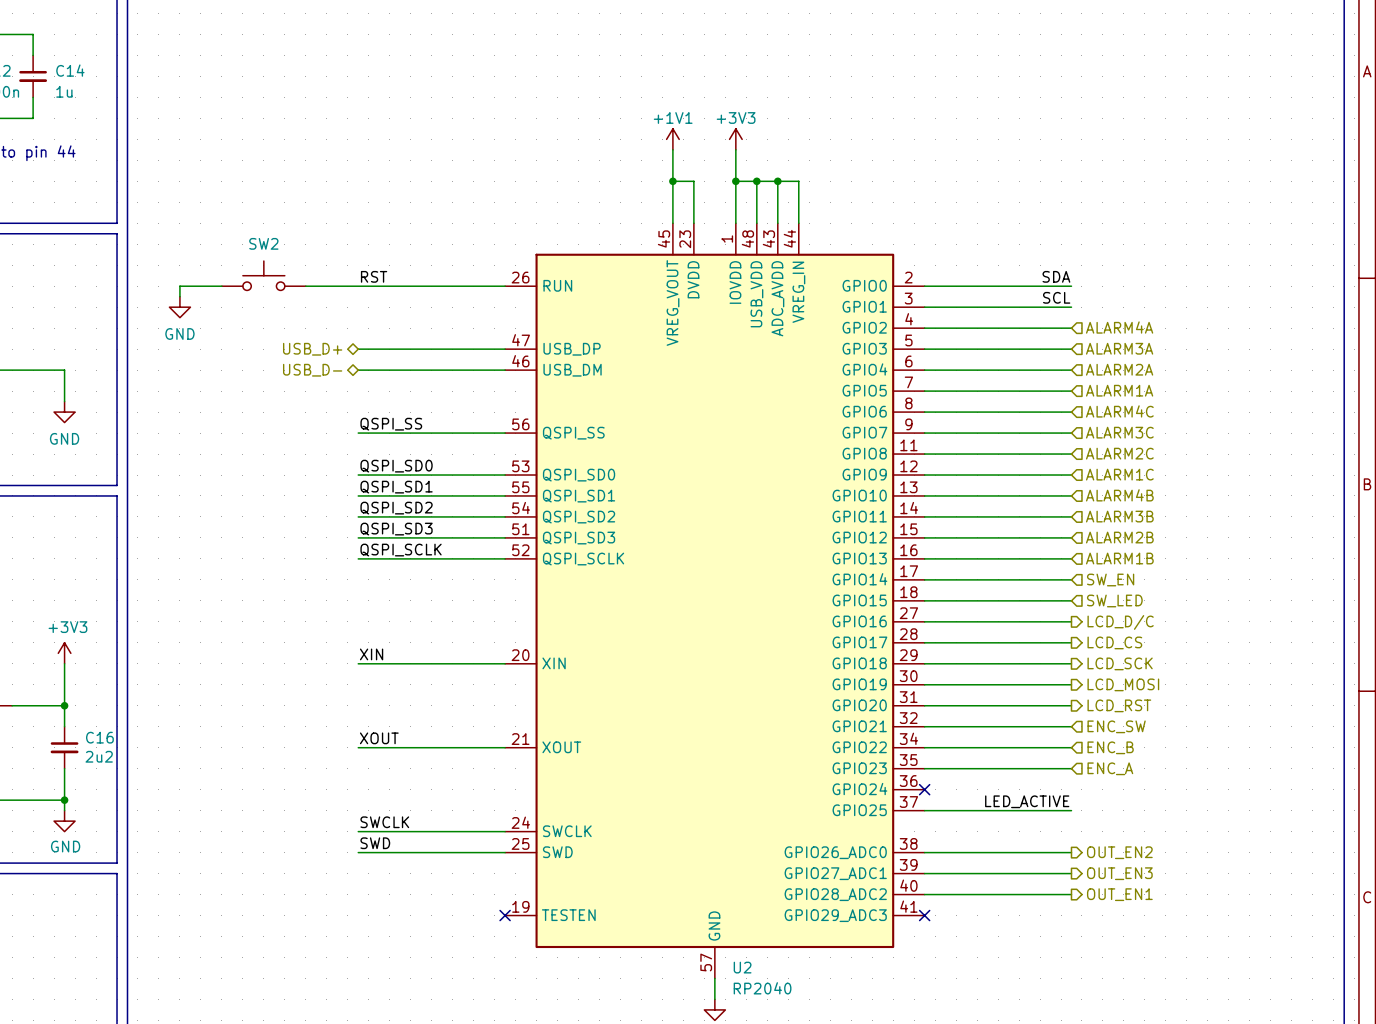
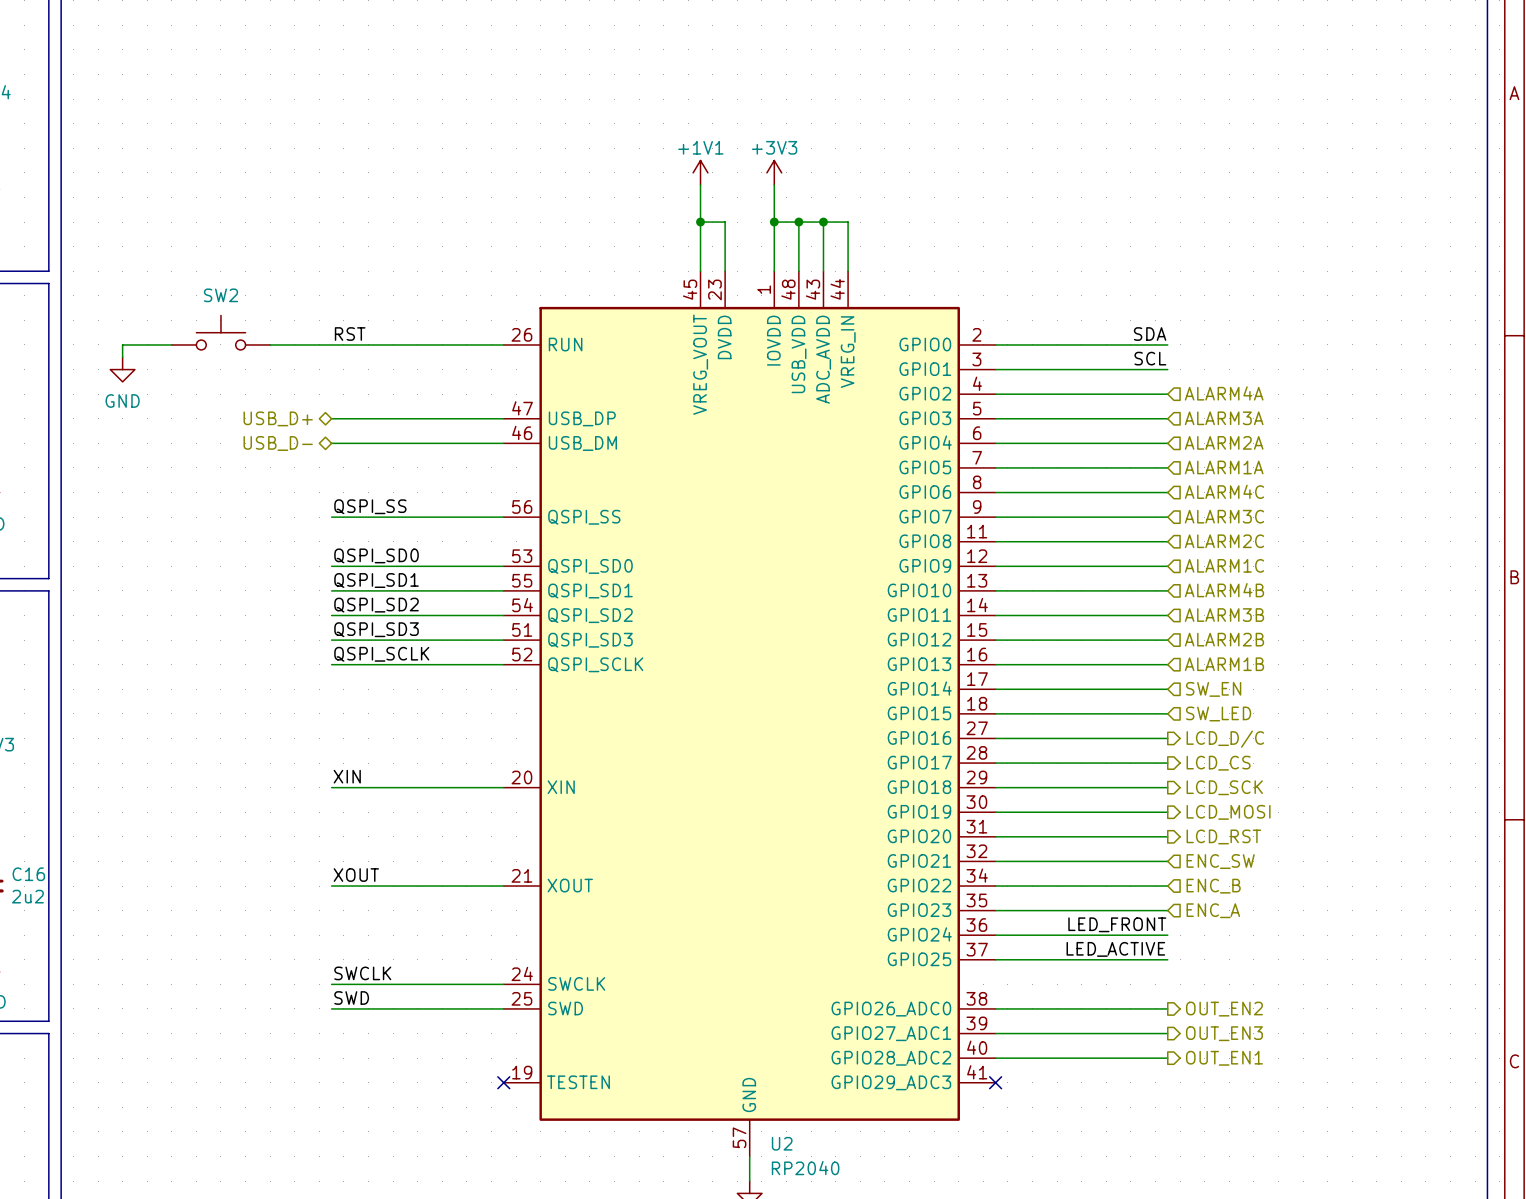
label: none -> LED_FRONT (1117, 924)
wire: none -> (995, 935) (1167, 935)
no-connect mark: (924, 789) -> none

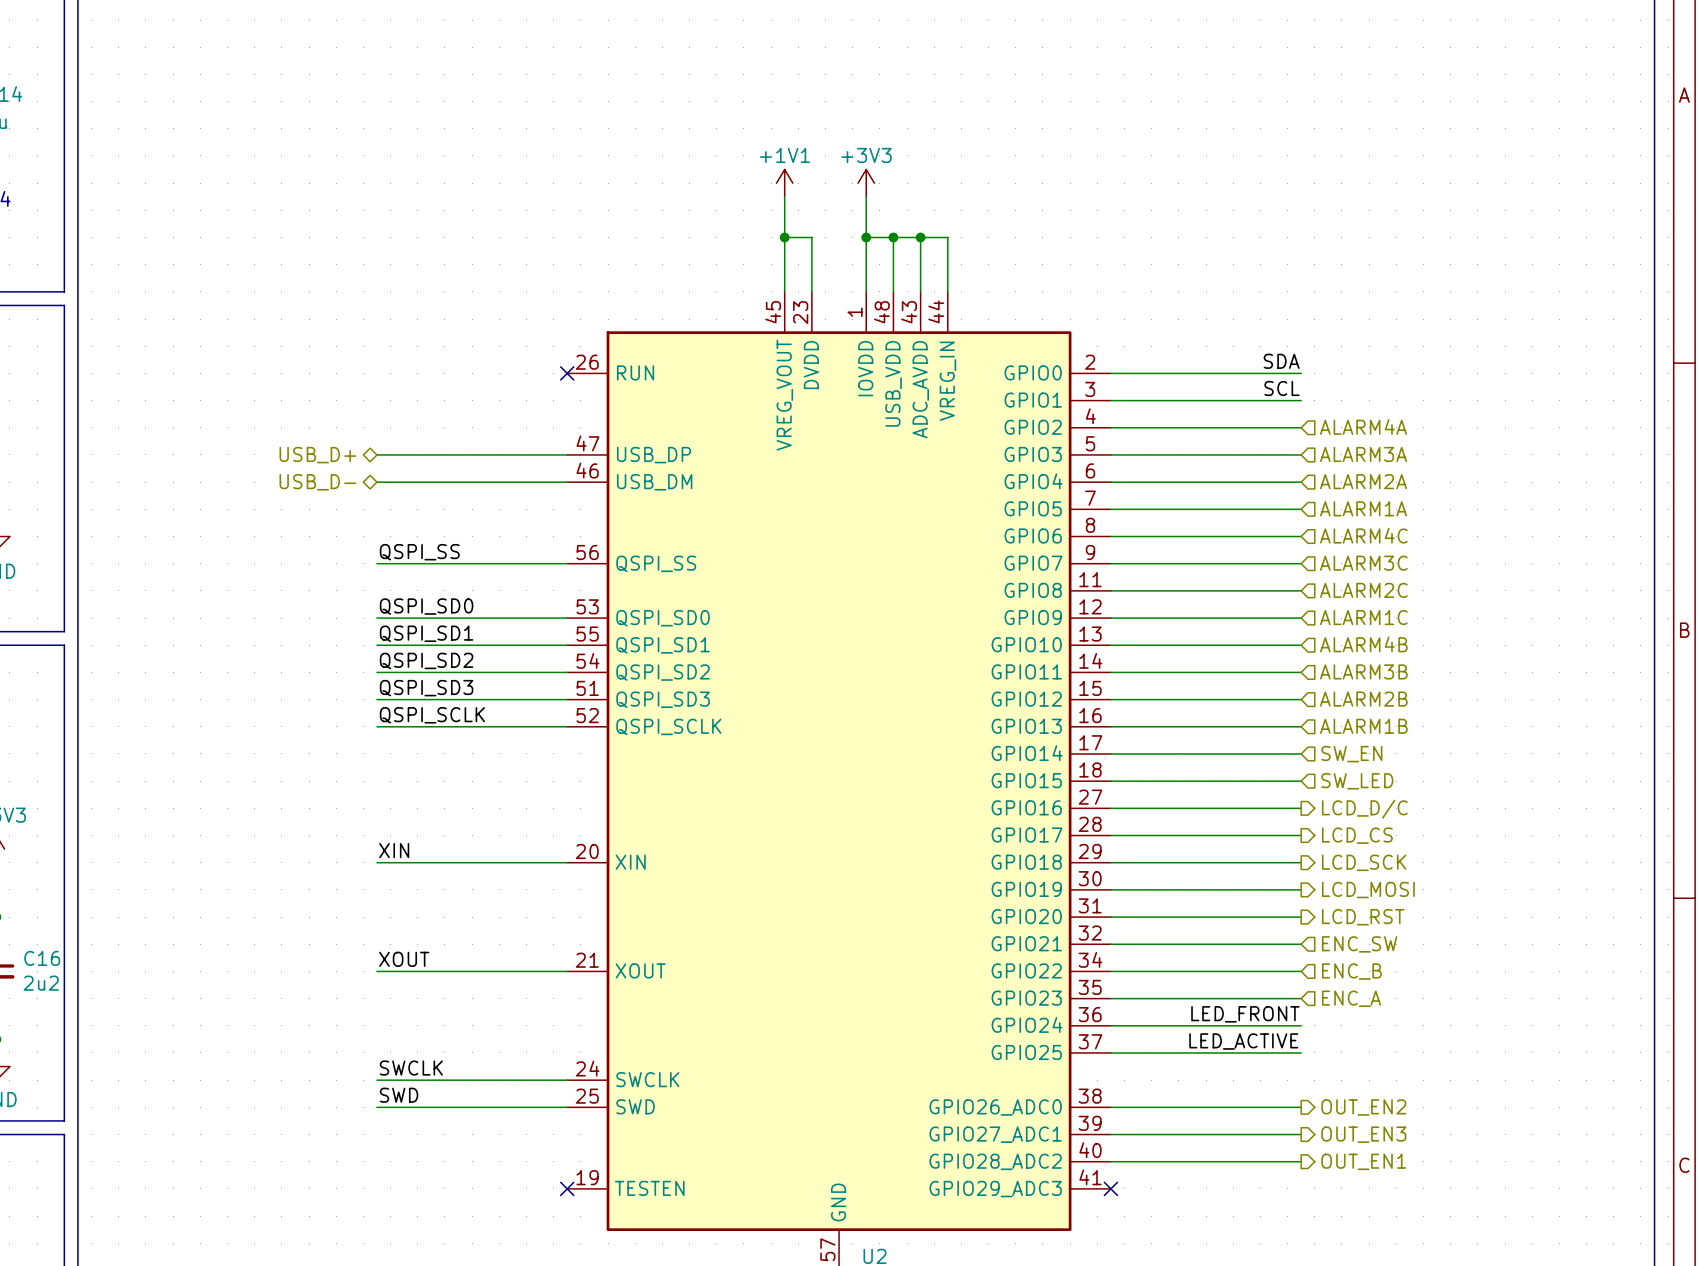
SW2: (220, 332) -> none
label: RST (350, 334) -> none
wire: (171, 344) (122, 344) (122, 357) -> none
wire: (270, 344) (503, 344) -> none
no-connect mark: none -> (567, 373)
power symbol: GND (122, 369) -> none

